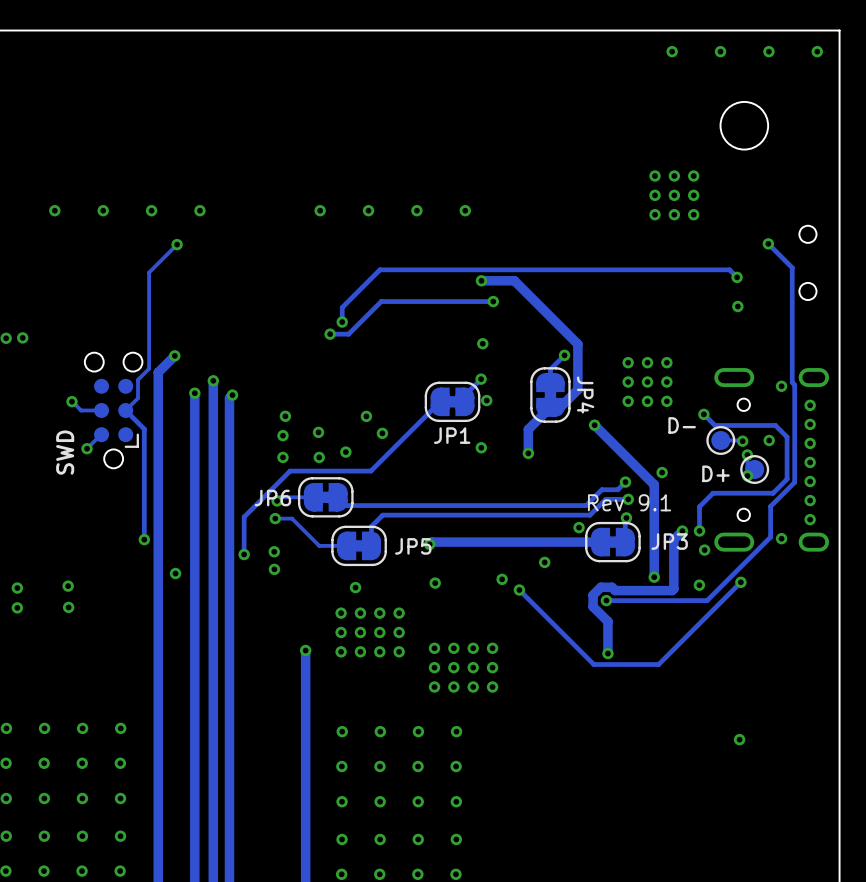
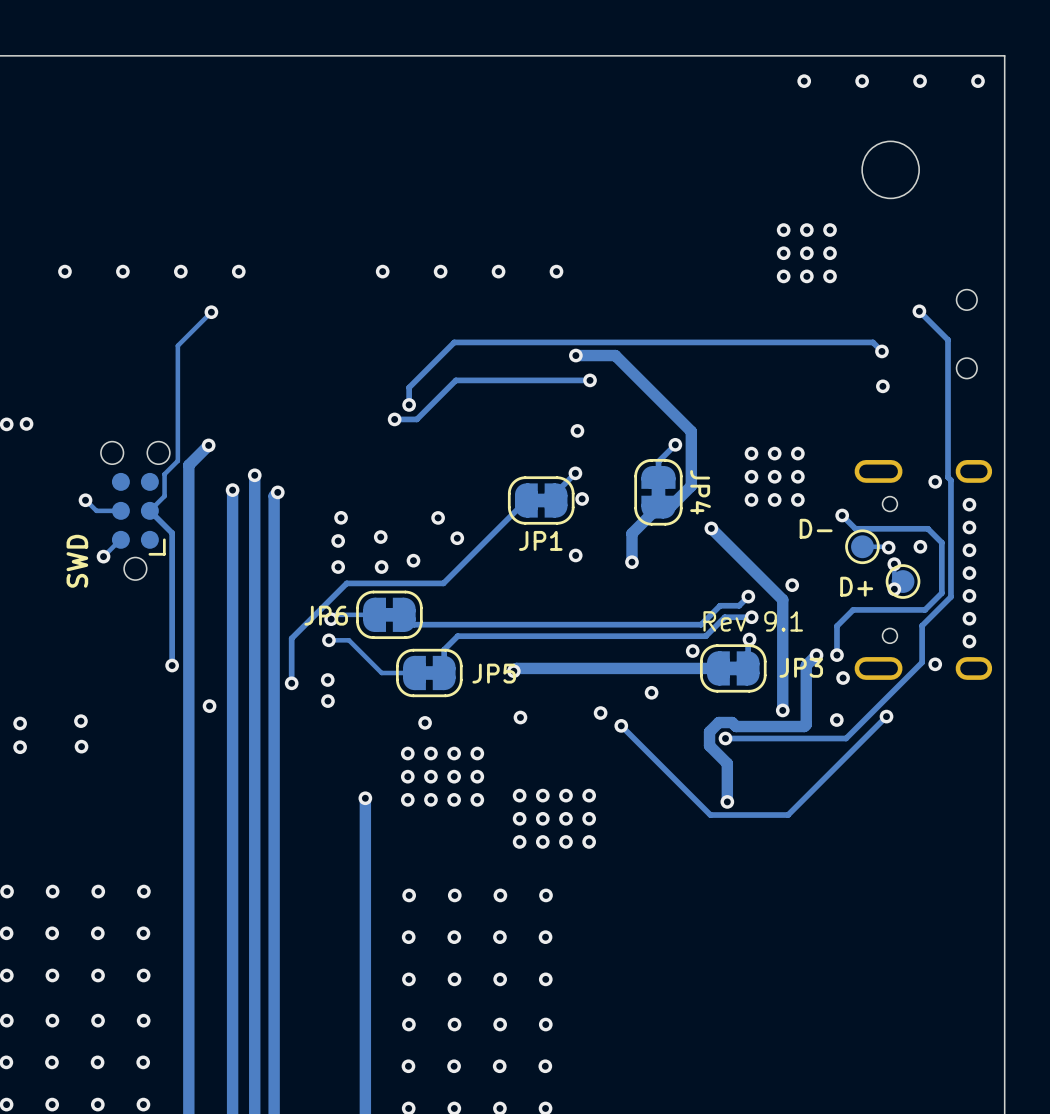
via: (739, 739) -> none

